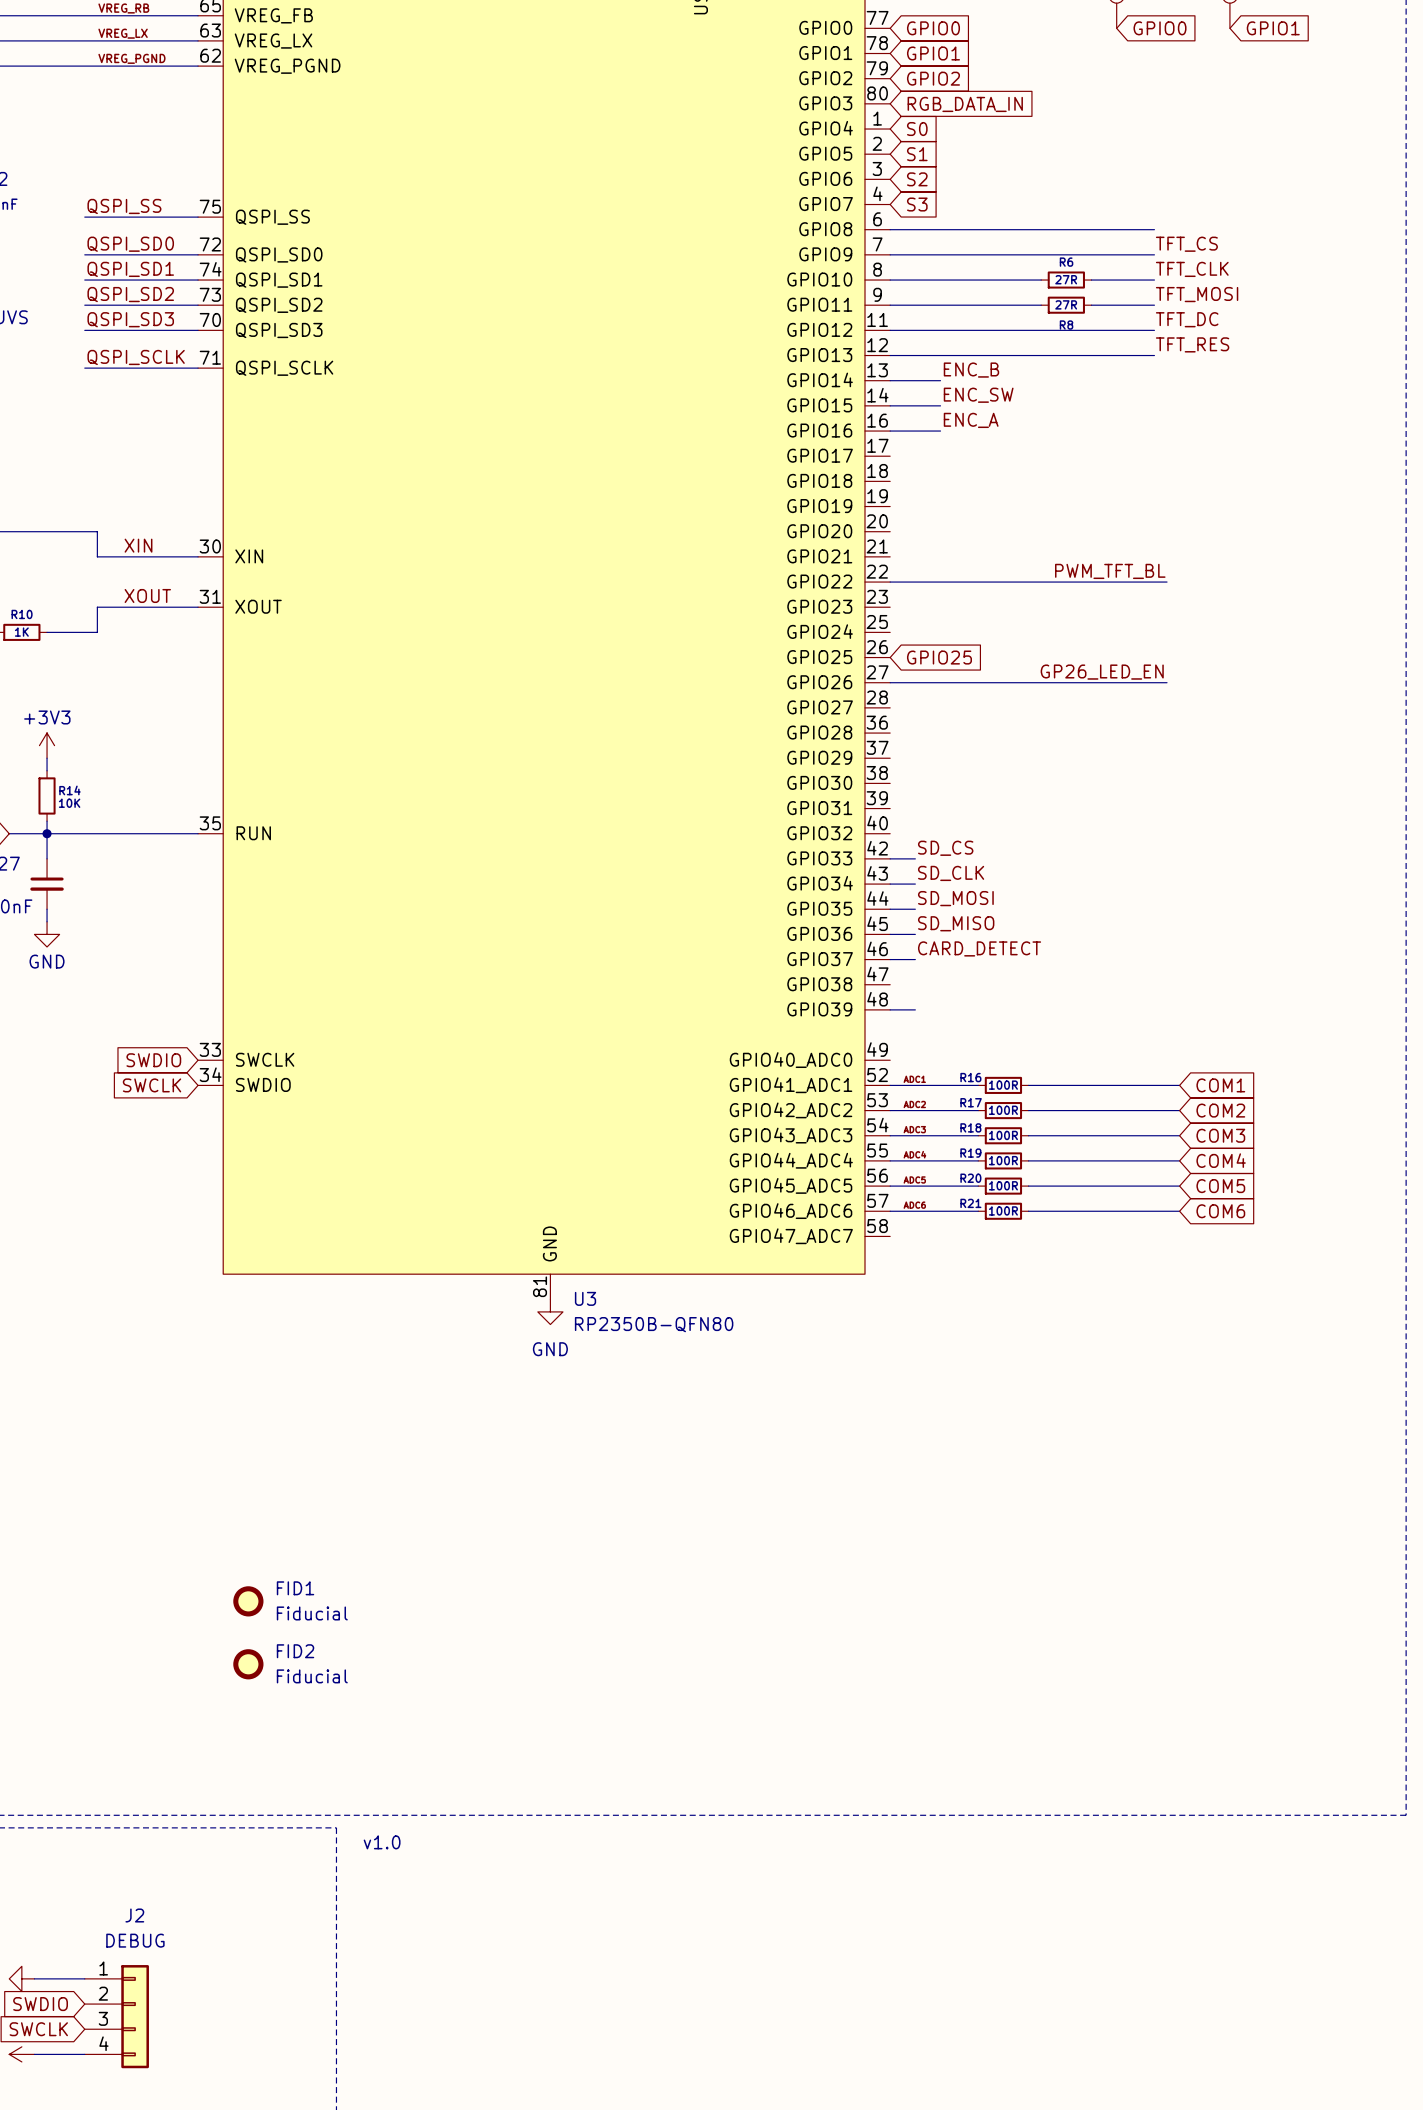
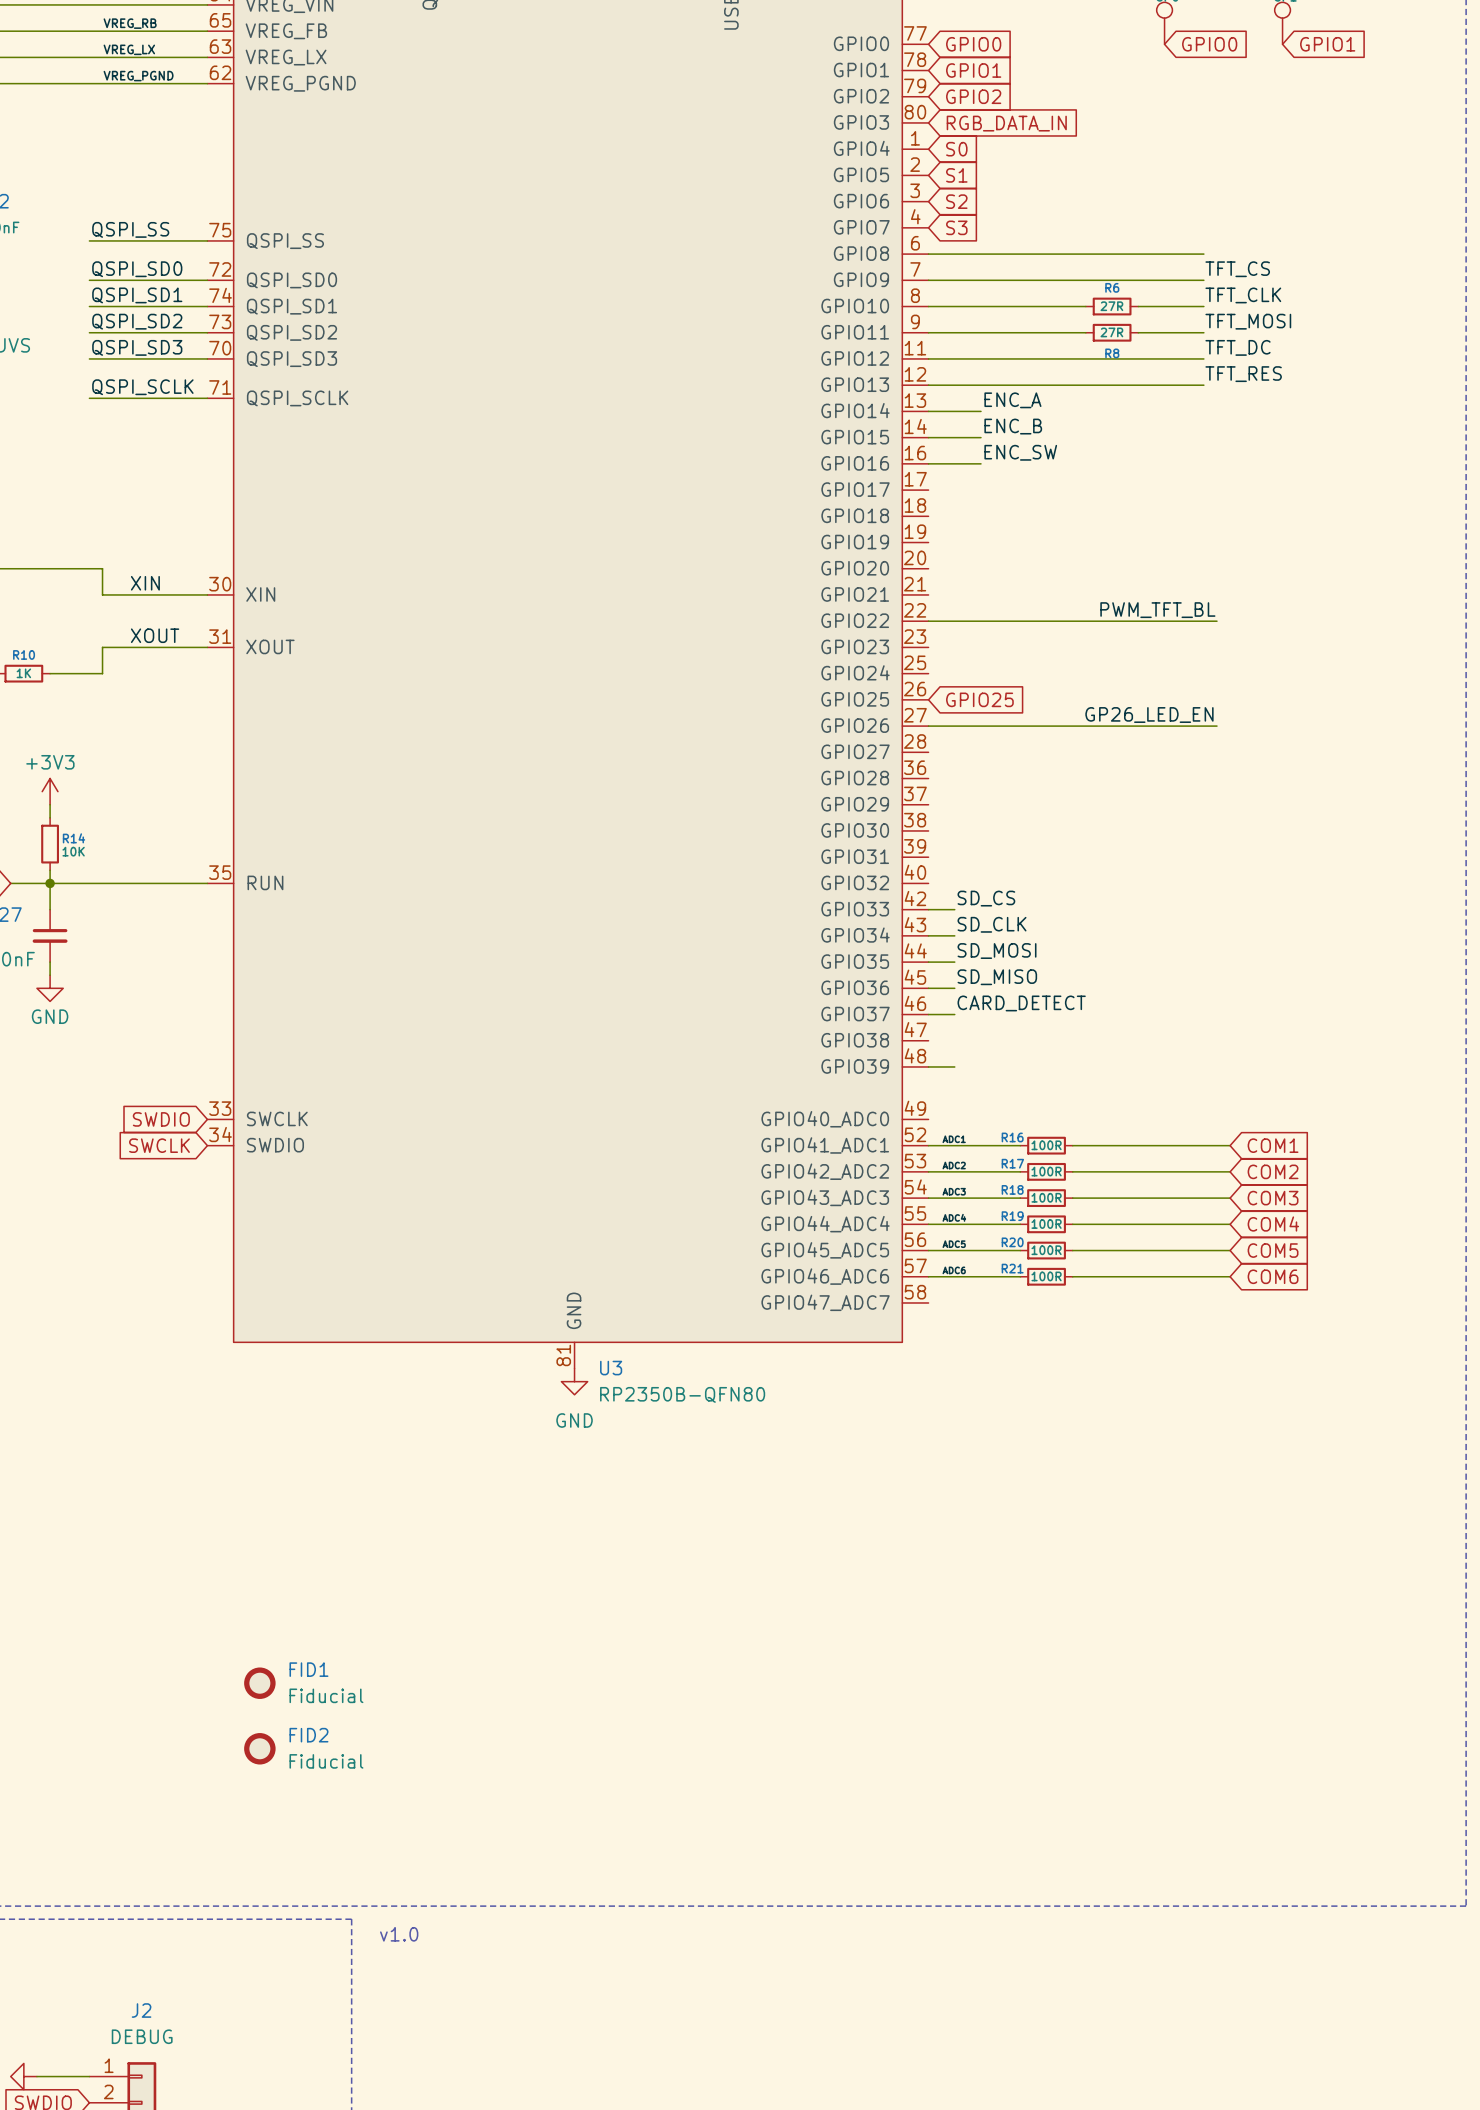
label: ENC_B (971, 370) -> ENC_A (1012, 400)
label: ENC_SW (978, 395) -> ENC_B (1013, 426)
label: ENC_A (971, 420) -> ENC_SW (1020, 452)

